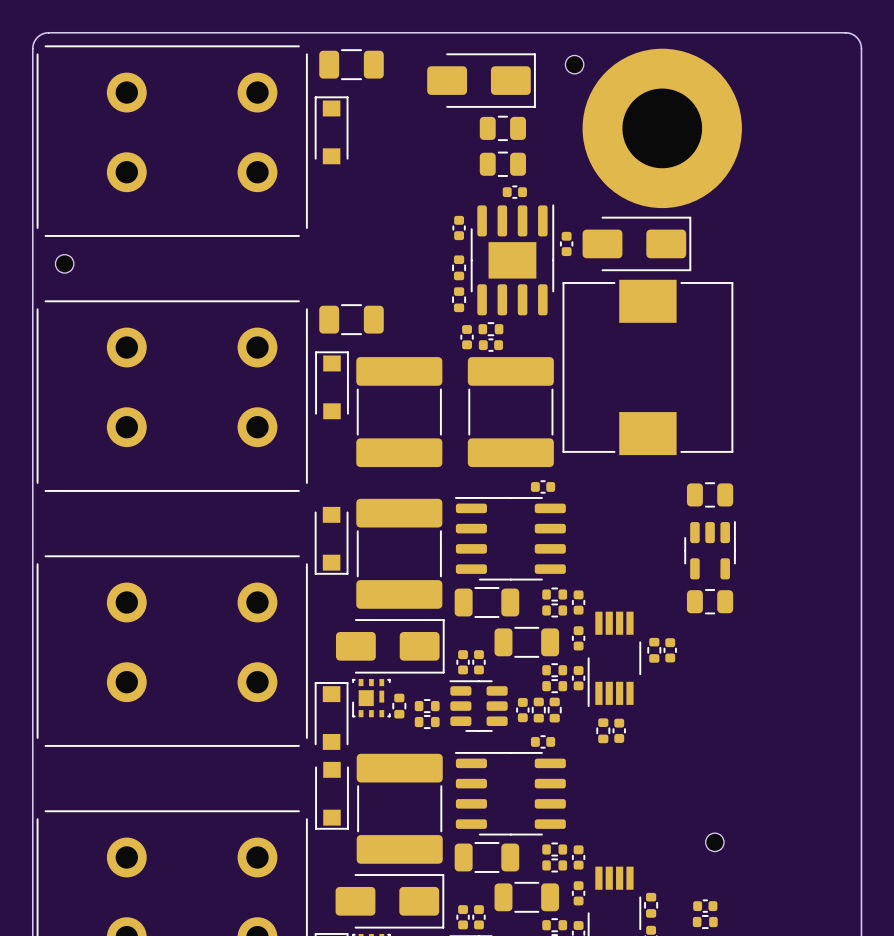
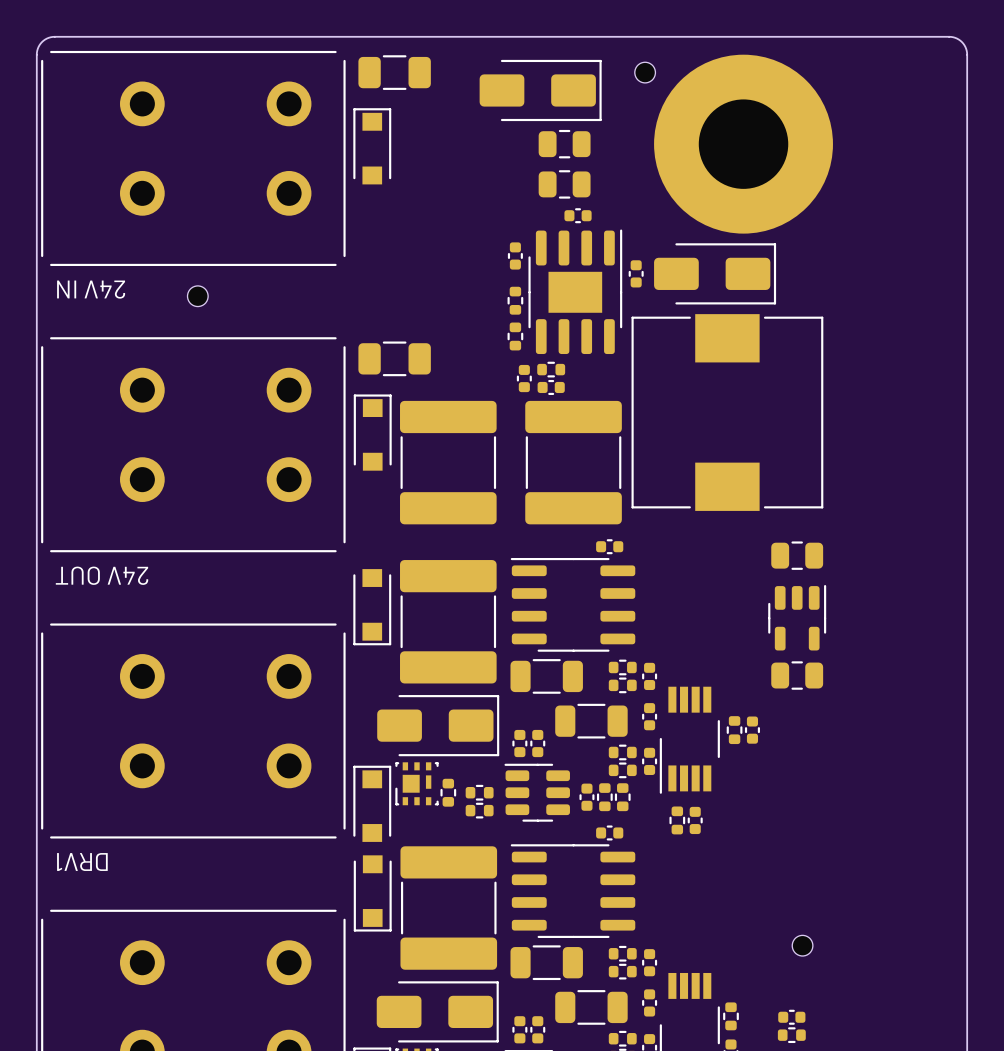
text: none -> 24V IN (91, 289)
part position: (64, 263) -> (197, 296)
text: none -> 24V OUT (101, 575)
text: none -> DRV1 (82, 862)

